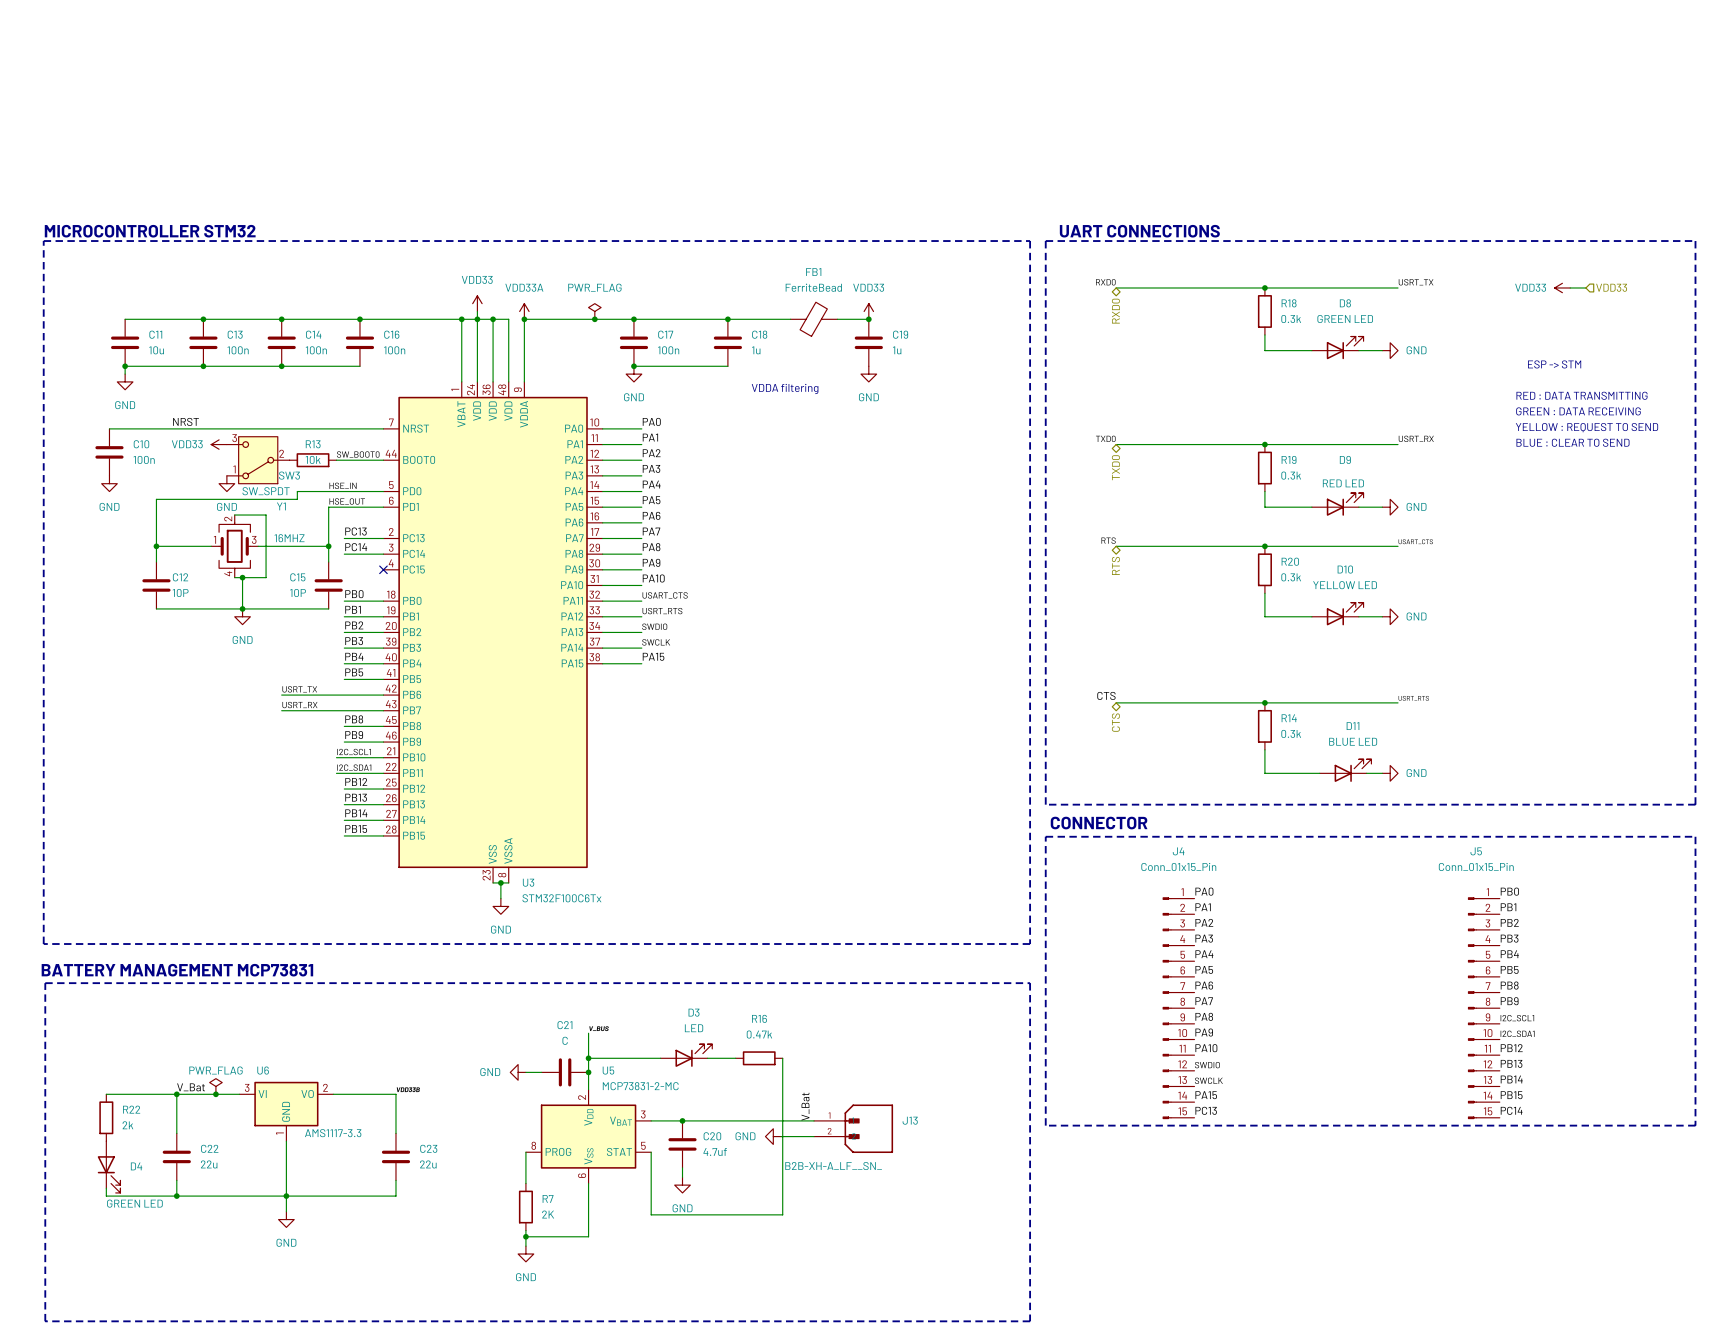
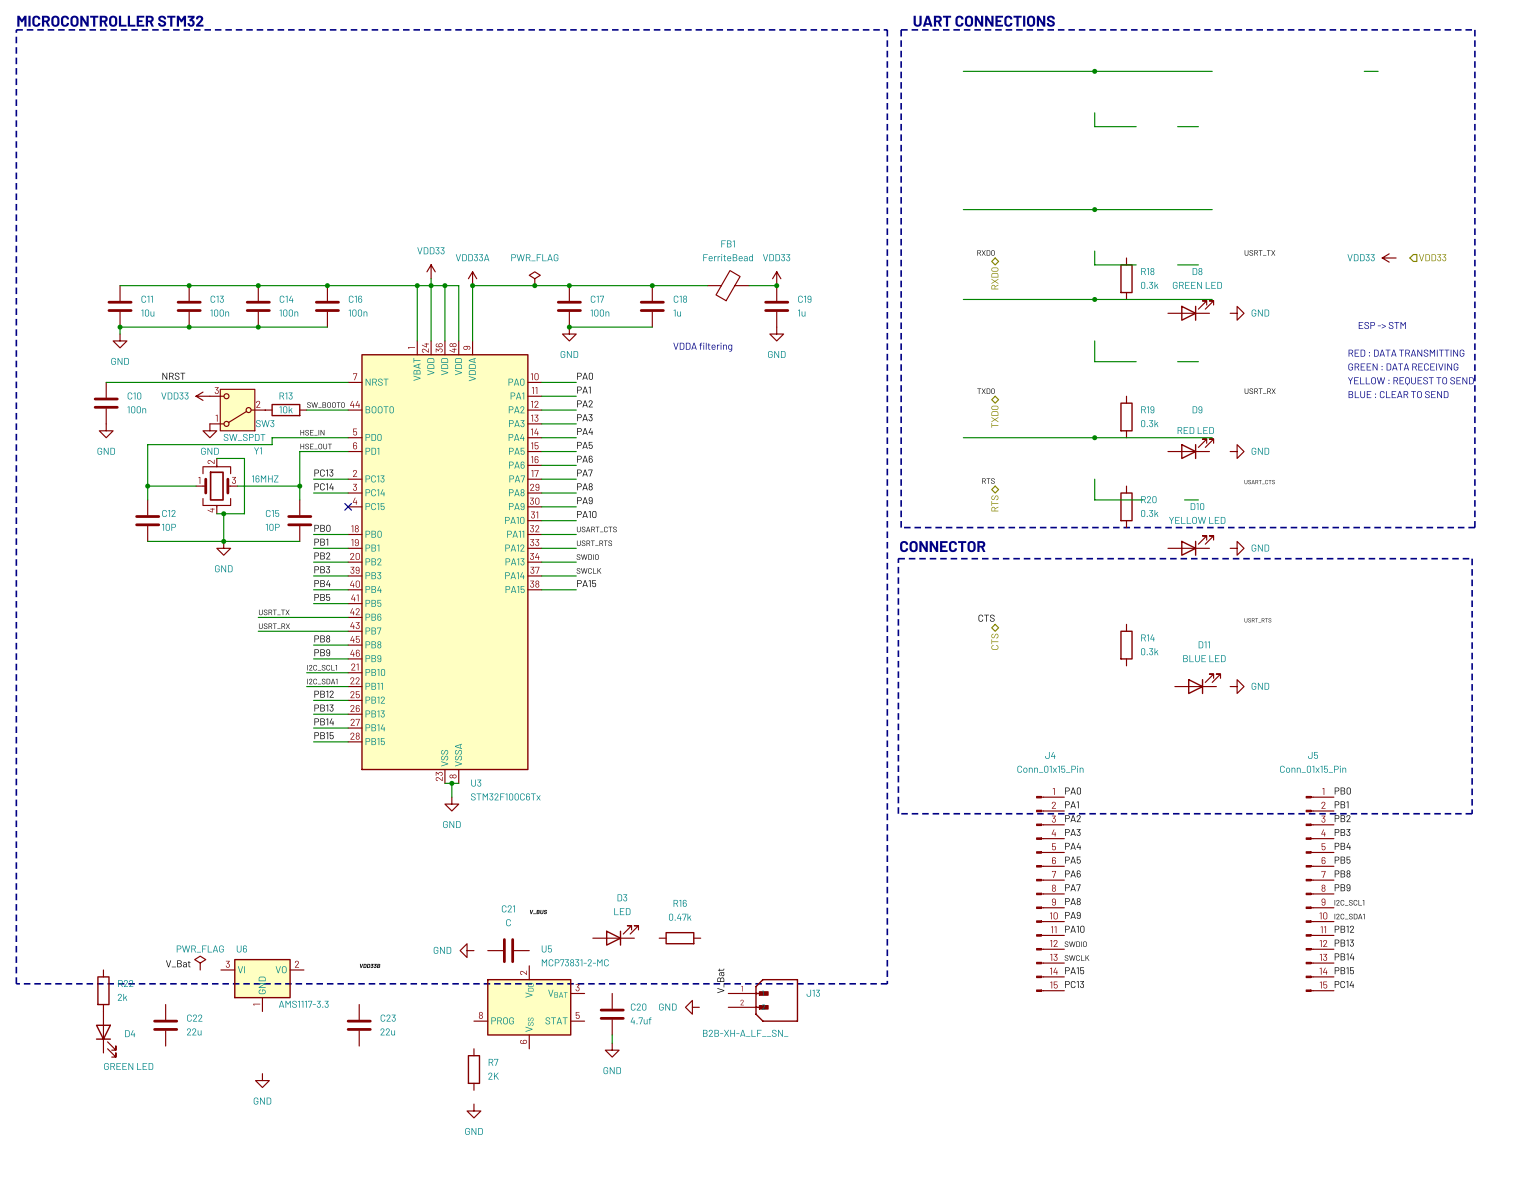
text: none -> MICROCONTROLLER STM32 (110, 21)
text: none -> UART CONNECTIONS (984, 21)
line: none -> (901, 29) (1474, 29) (1474, 527) (901, 527) (901, 29)
wire: none -> (963, 71) (1212, 71)
junction: none -> (1094, 71)
wire: none -> (1364, 71) (1378, 71)
wire: none -> (1094, 112) (1094, 126) (1136, 126)
wire: none -> (1177, 126) (1198, 126)
text: MICROCONTROLLER STM32 (150, 231) -> none
text: UART CONNECTIONS (1139, 231) -> none
junction: none -> (1094, 209)
line: (43, 241) (1030, 241) (1030, 944) (43, 944) (43, 241) -> (16, 29) (16, 983) (887, 983) (887, 29) (16, 29)
line: (1045, 241) (1045, 804) (1695, 804) (1695, 241) (1045, 241) -> none
wire: (1116, 287) (1398, 287) -> (963, 209) (1212, 209)
junction: (1264, 287) -> none
wire: (1570, 287) (1585, 287) -> none
junction: none -> (1094, 299)
wire: (1264, 334) (1264, 350) (1311, 350) -> (1094, 251) (1094, 264) (1136, 264)
wire: (1358, 350) (1382, 350) -> (1177, 264) (1198, 264)
wire: none -> (1094, 340) (1094, 361) (1136, 361)
wire: (1116, 444) (1398, 444) -> (963, 299) (1212, 299)
junction: (1264, 444) -> none
junction: none -> (1094, 437)
wire: (1264, 491) (1264, 507) (1311, 507) -> none
wire: (1358, 507) (1382, 507) -> (1177, 361) (1198, 361)
wire: none -> (1094, 479) (1094, 499) (1143, 499)
wire: (1116, 546) (1398, 546) -> (963, 437) (1212, 437)
junction: (1264, 546) -> none
wire: none -> (1184, 499) (1198, 499)
wire: (1264, 593) (1264, 616) (1311, 616) -> none
text: none -> CONNECTOR (942, 546)
wire: (1358, 616) (1382, 616) -> none
line: none -> (898, 558) (1472, 558) (1472, 813) (898, 813) (898, 558)
wire: (1116, 702) (1398, 702) -> none
junction: (1264, 702) -> none
wire: (1264, 749) (1264, 773) (1319, 773) -> none
wire: (1366, 773) (1382, 773) -> none
text: CONNECTOR (1099, 823) -> none
line: (1045, 836) (1695, 836) (1695, 1125) (1045, 1125) (1045, 836) -> none
text: BATTERY MANAGEMENT MCP73831 (177, 970) -> none
line: (45, 983) (1030, 983) (1030, 1321) (45, 1321) (45, 983) -> none
wire: (588, 1033) (588, 1089) -> none
wire: (588, 1058) (660, 1058) -> none
junction: (588, 1058) -> none
wire: (707, 1058) (735, 1058) -> none
wire: (782, 1058) (782, 1214) (651, 1214) (651, 1152) -> none
wire: (525, 1072) (541, 1072) -> none
junction: (588, 1072) -> none
wire: (106, 1094) (239, 1094) -> none
wire: (176, 1094) (176, 1133) -> none
junction: (176, 1094) -> none
junction: (215, 1094) -> none
wire: (333, 1094) (395, 1094) (395, 1133) -> none
wire: (651, 1120) (814, 1120) -> none
junction: (682, 1120) -> none
wire: (781, 1136) (814, 1136) -> none
wire: (286, 1141) (286, 1211) -> none
wire: (525, 1152) (525, 1183) -> none
wire: (176, 1180) (176, 1196) -> none
wire: (395, 1180) (395, 1196) (106, 1196) (106, 1188) -> none
wire: (588, 1183) (588, 1236) (525, 1236) -> none
junction: (176, 1196) -> none
junction: (286, 1196) -> none
wire: (525, 1230) (525, 1246) -> none
junction: (525, 1236) -> none

